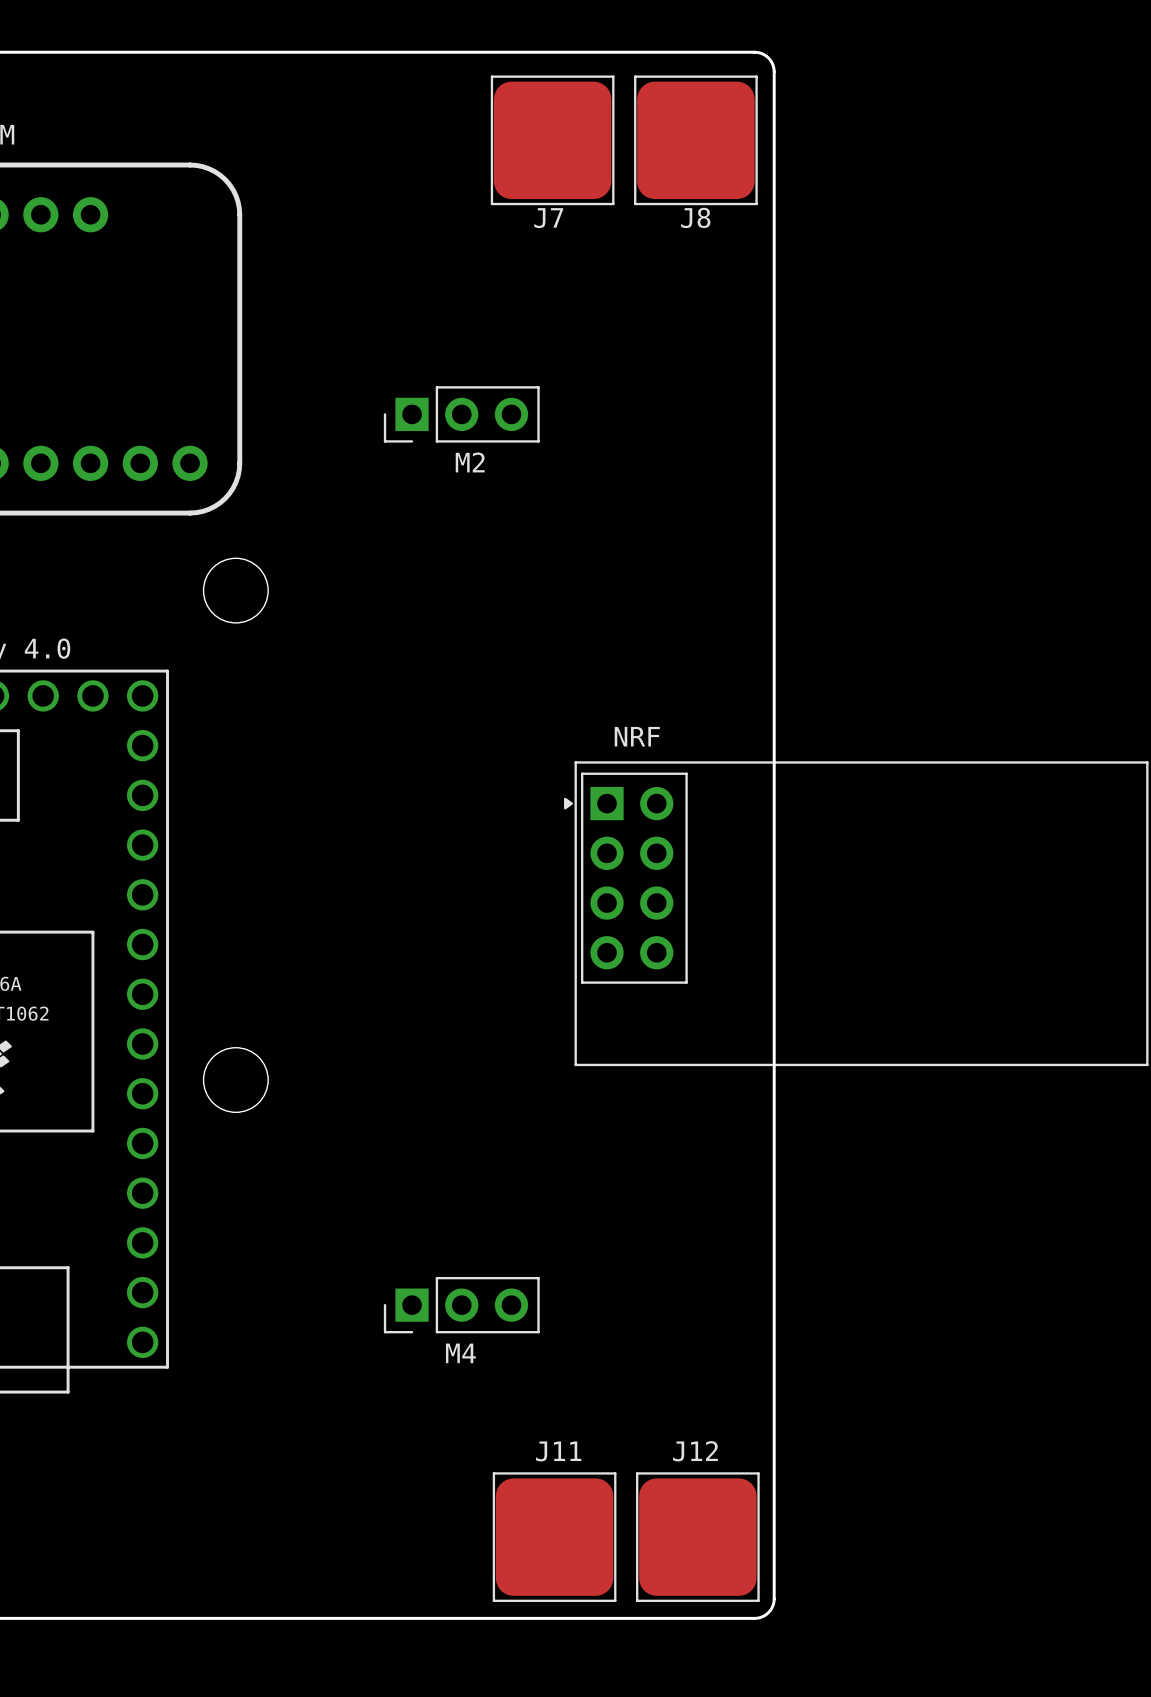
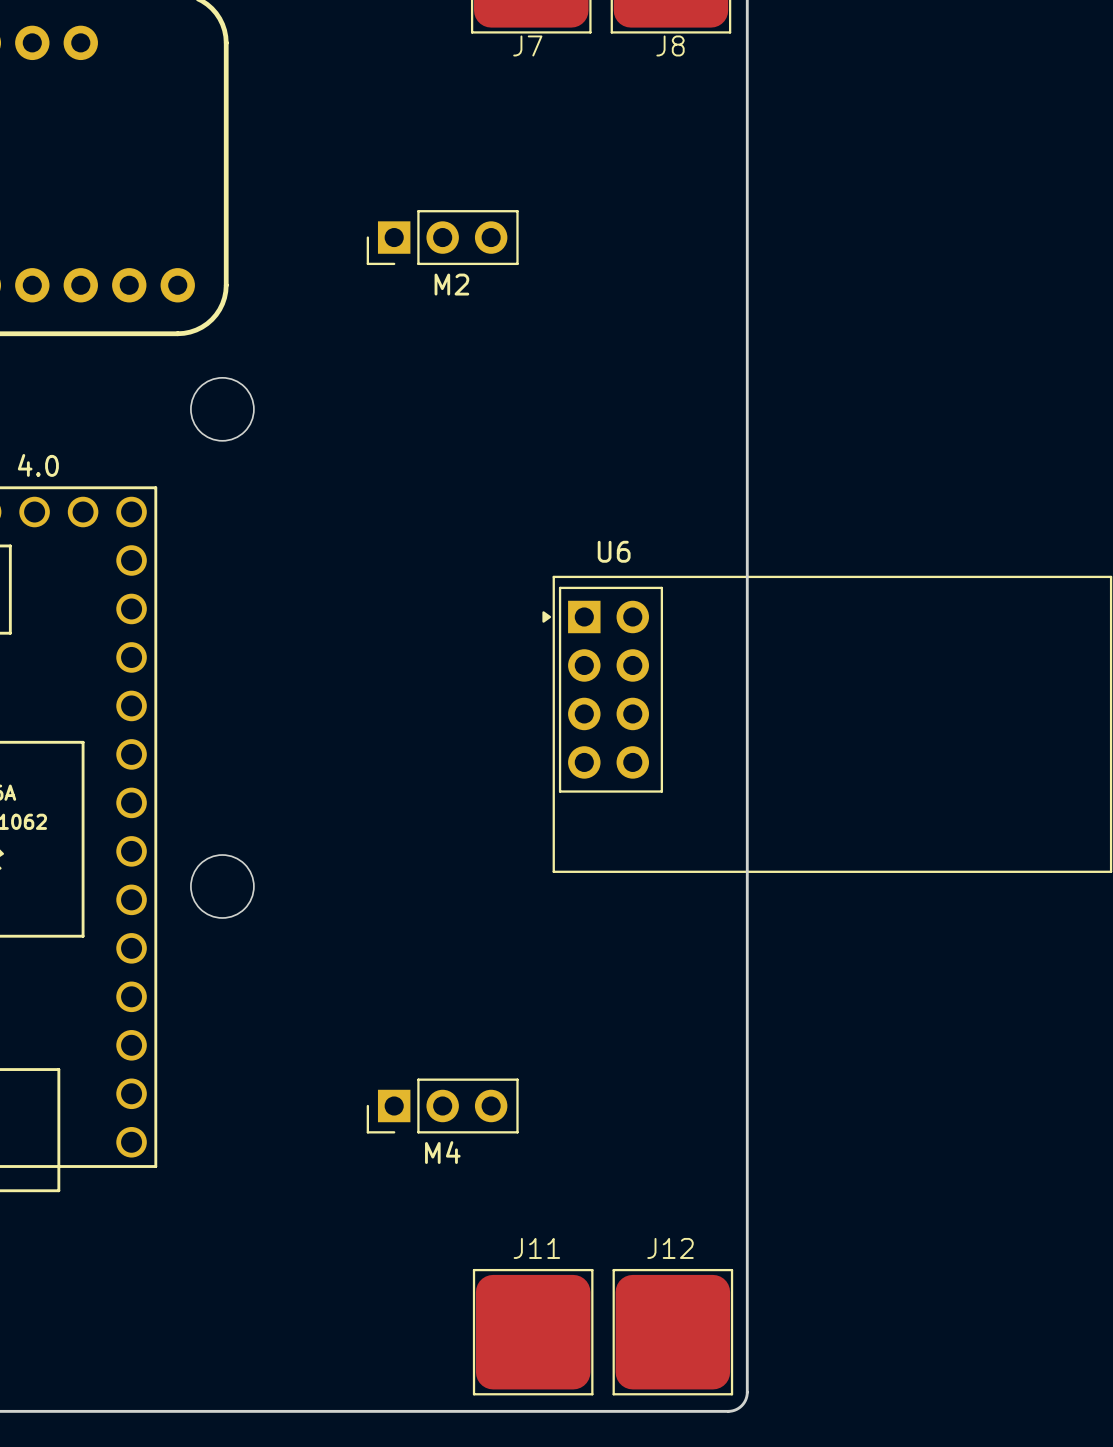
NRF name: NRF (637, 736) -> U6 (614, 551)

